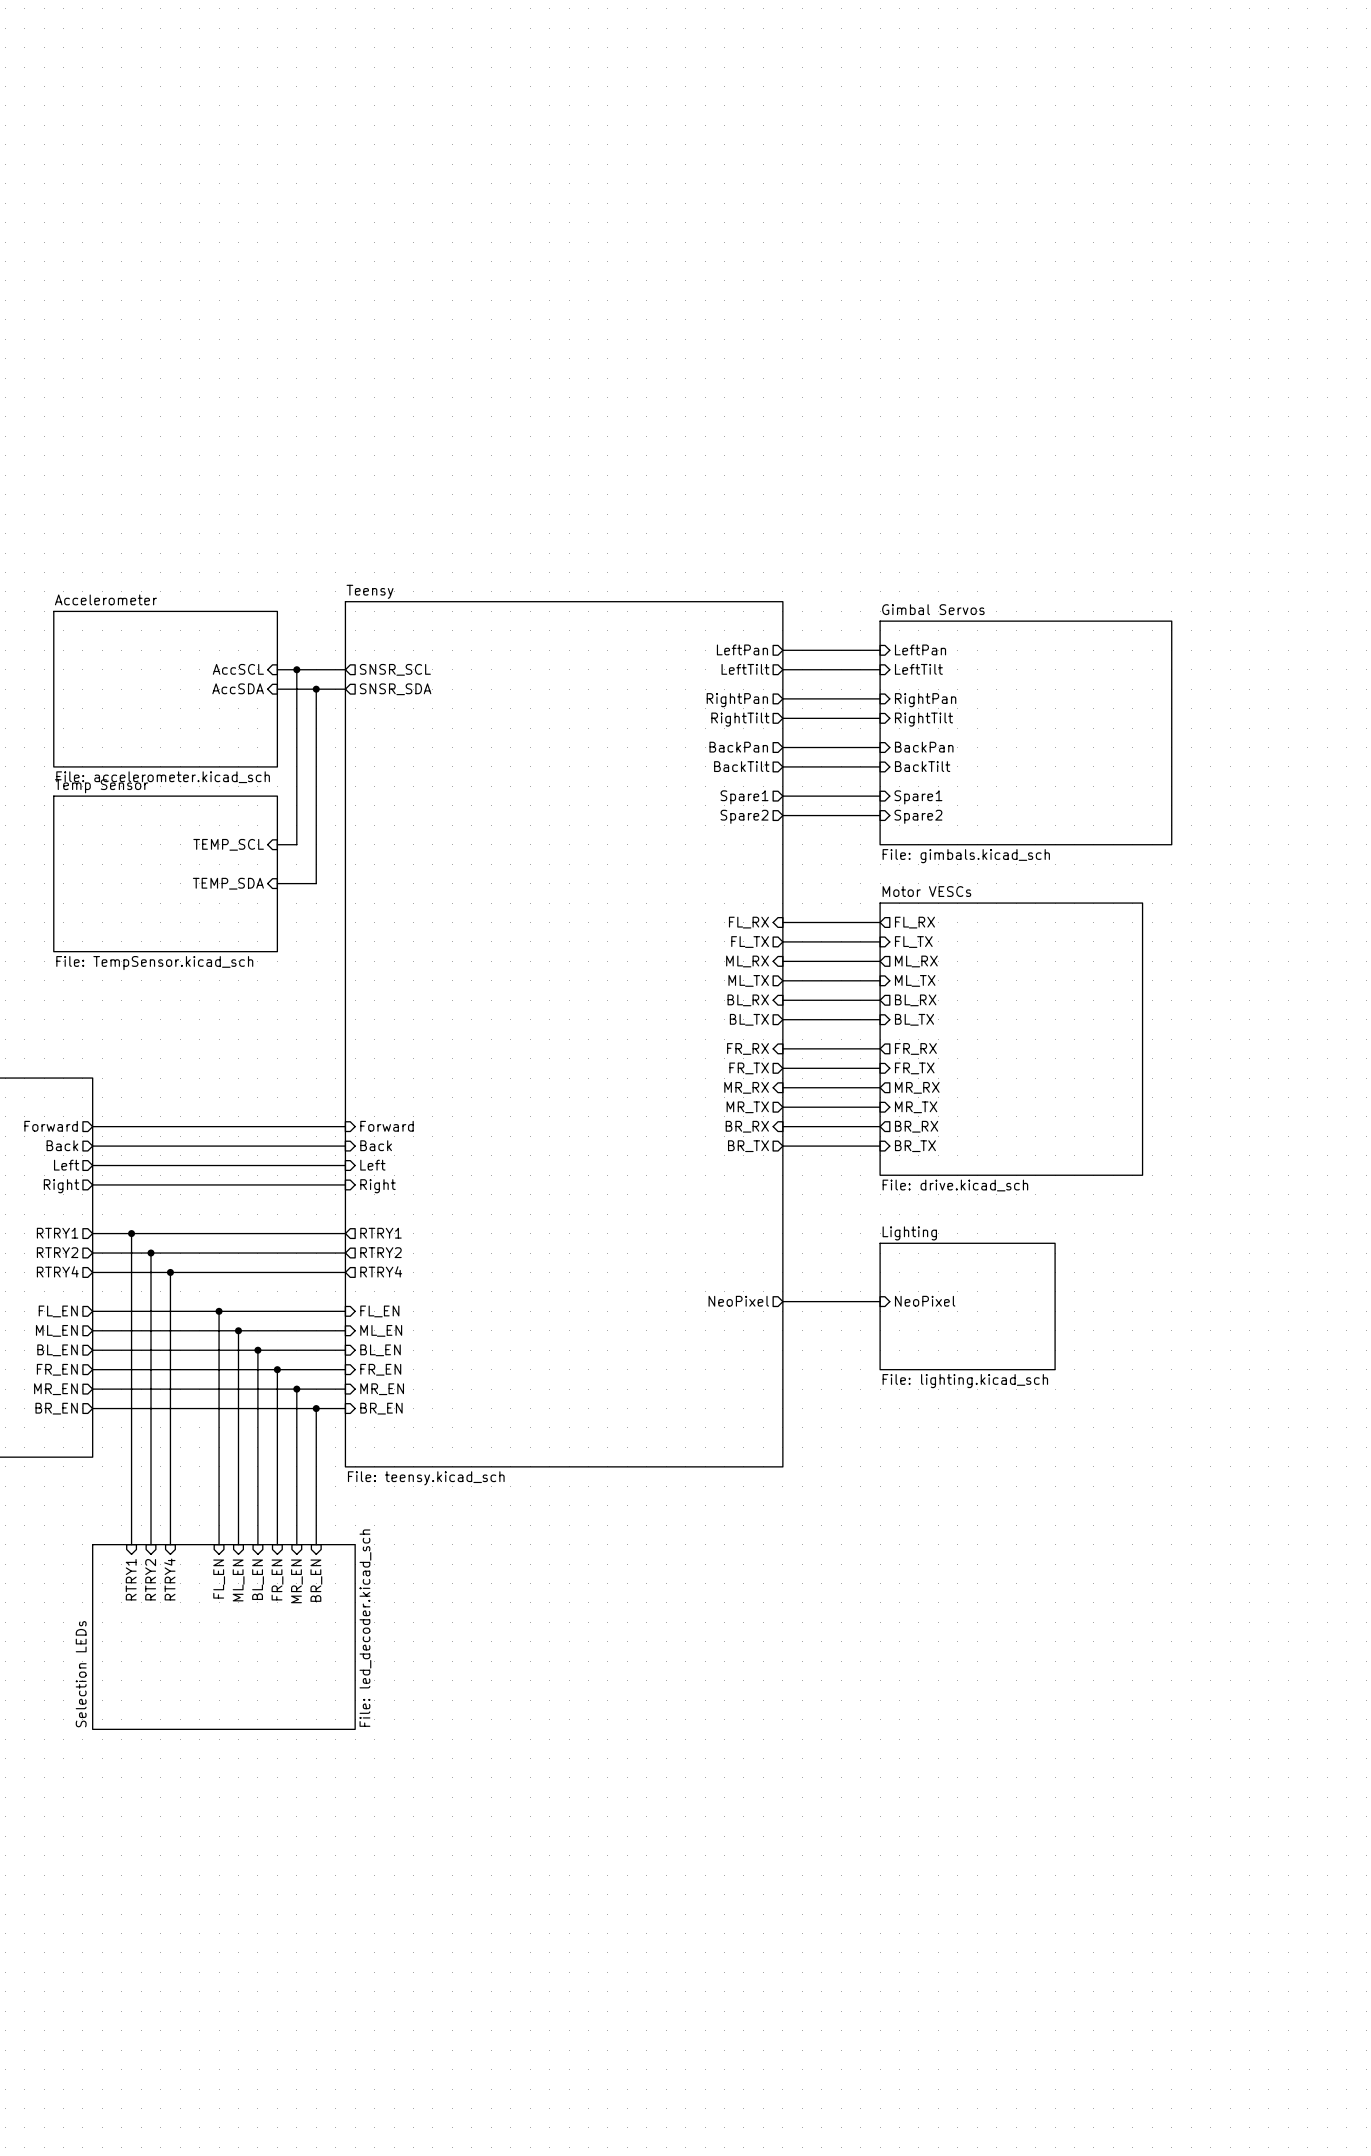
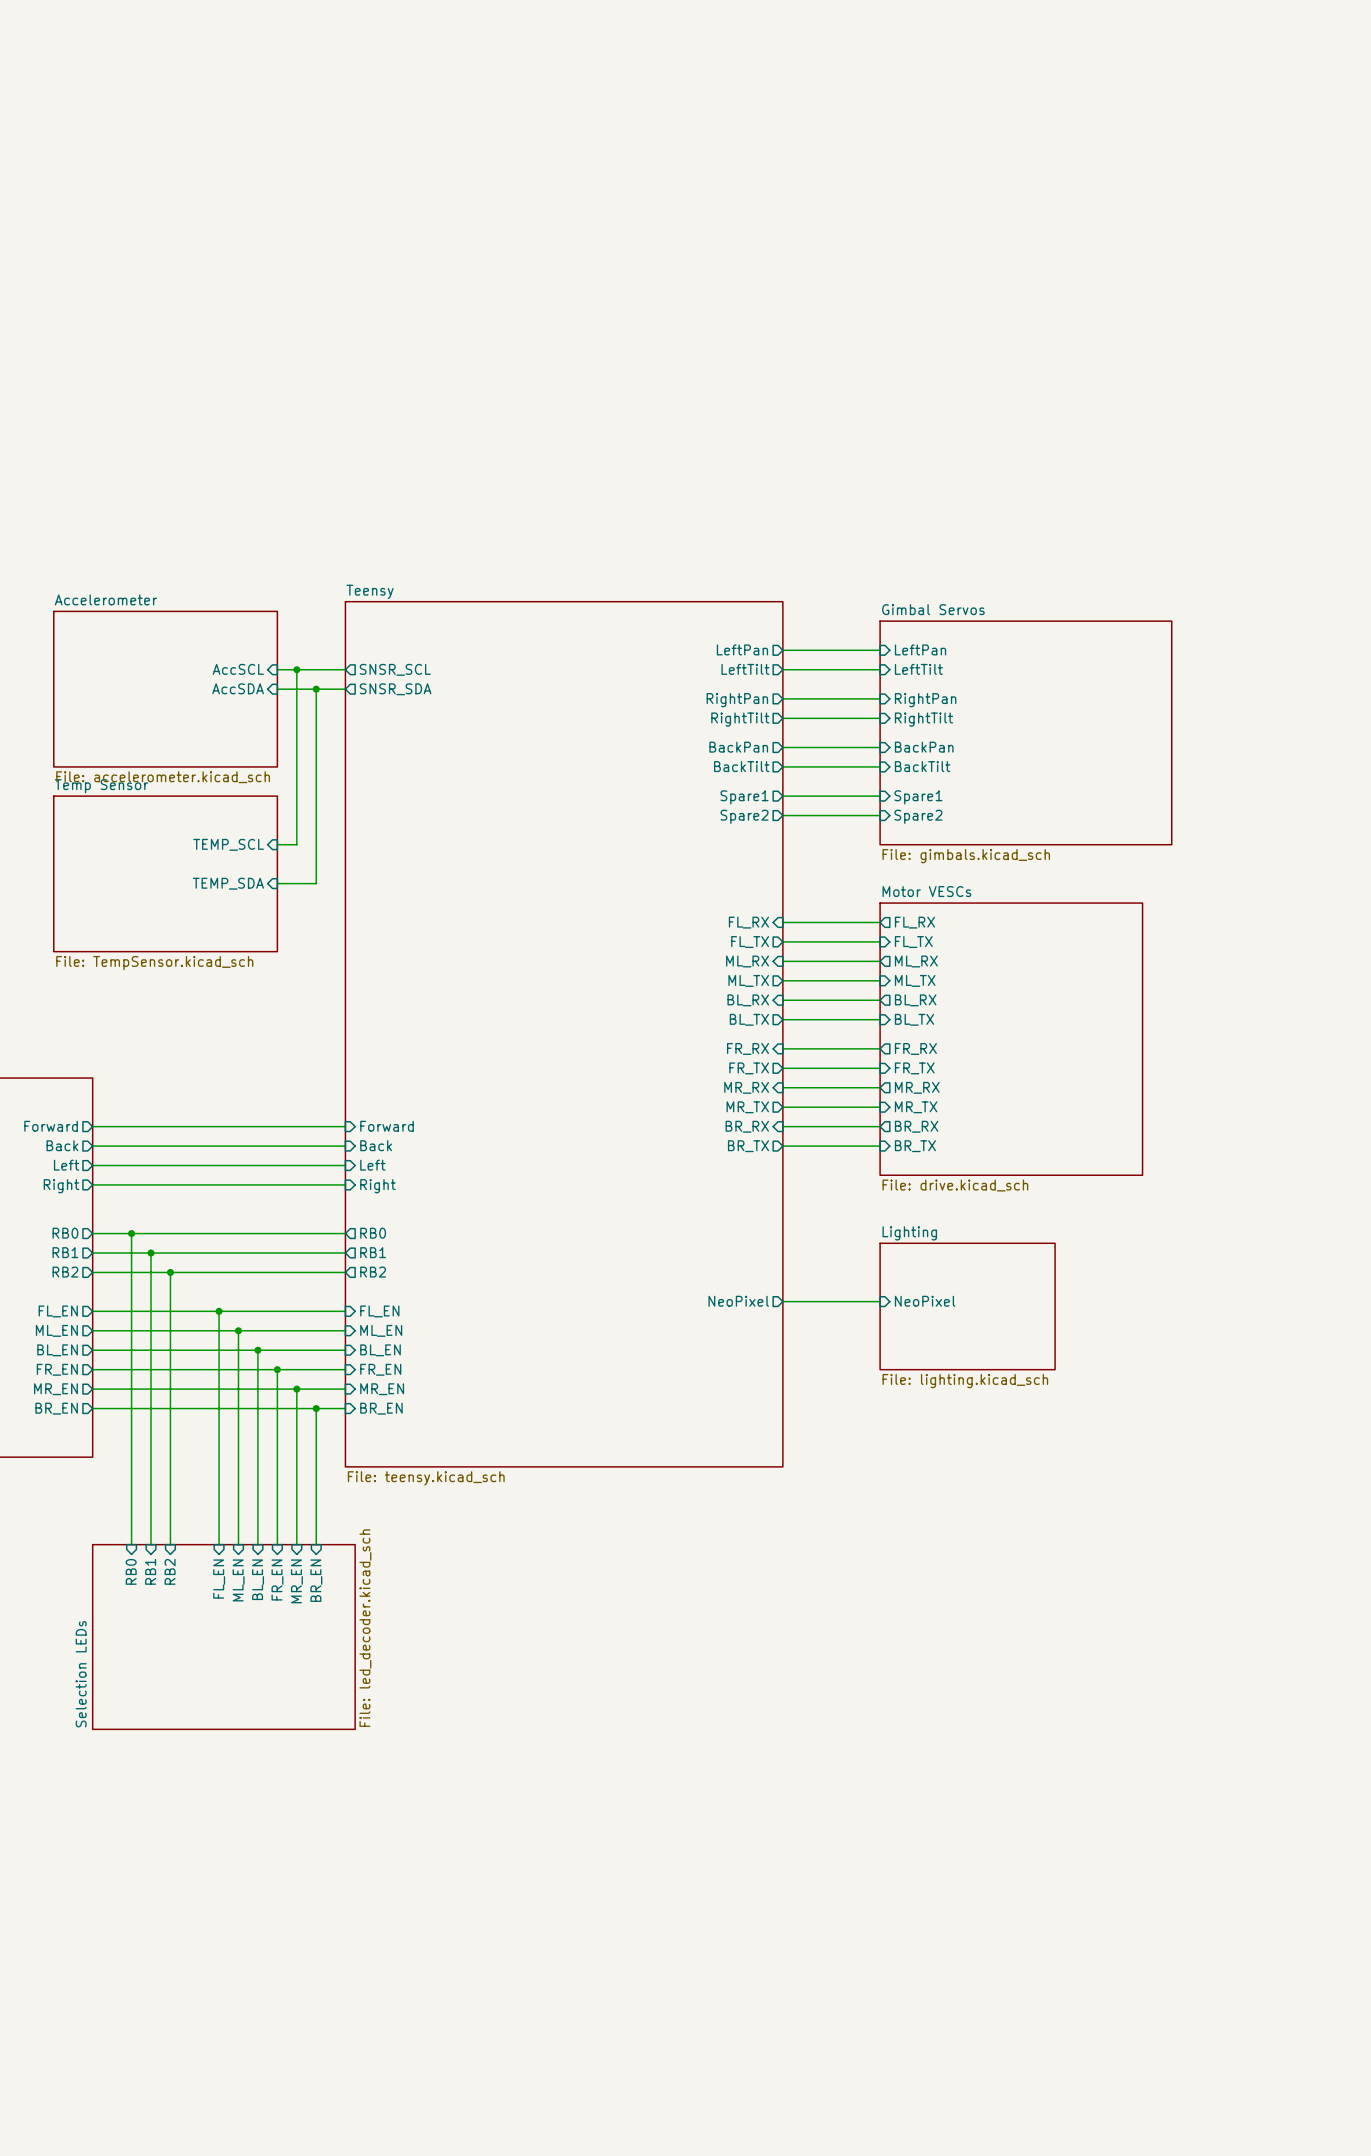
sheet pin: RTRY1 (57, 1233) -> RB0 (65, 1233)
sheet pin: RTRY1 (380, 1233) -> RB0 (373, 1233)
sheet pin: RTRY2 (57, 1252) -> RB1 (65, 1252)
sheet pin: RTRY2 (380, 1252) -> RB1 (373, 1252)
sheet pin: RTRY4 (57, 1271) -> RB2 (65, 1272)
sheet pin: RTRY4 (381, 1271) -> RB2 (373, 1272)
sheet pin: RTRY1 (131, 1579) -> RB0 (131, 1571)
sheet pin: RTRY2 (150, 1579) -> RB1 (150, 1571)
sheet pin: RTRY4 (169, 1579) -> RB2 (170, 1571)

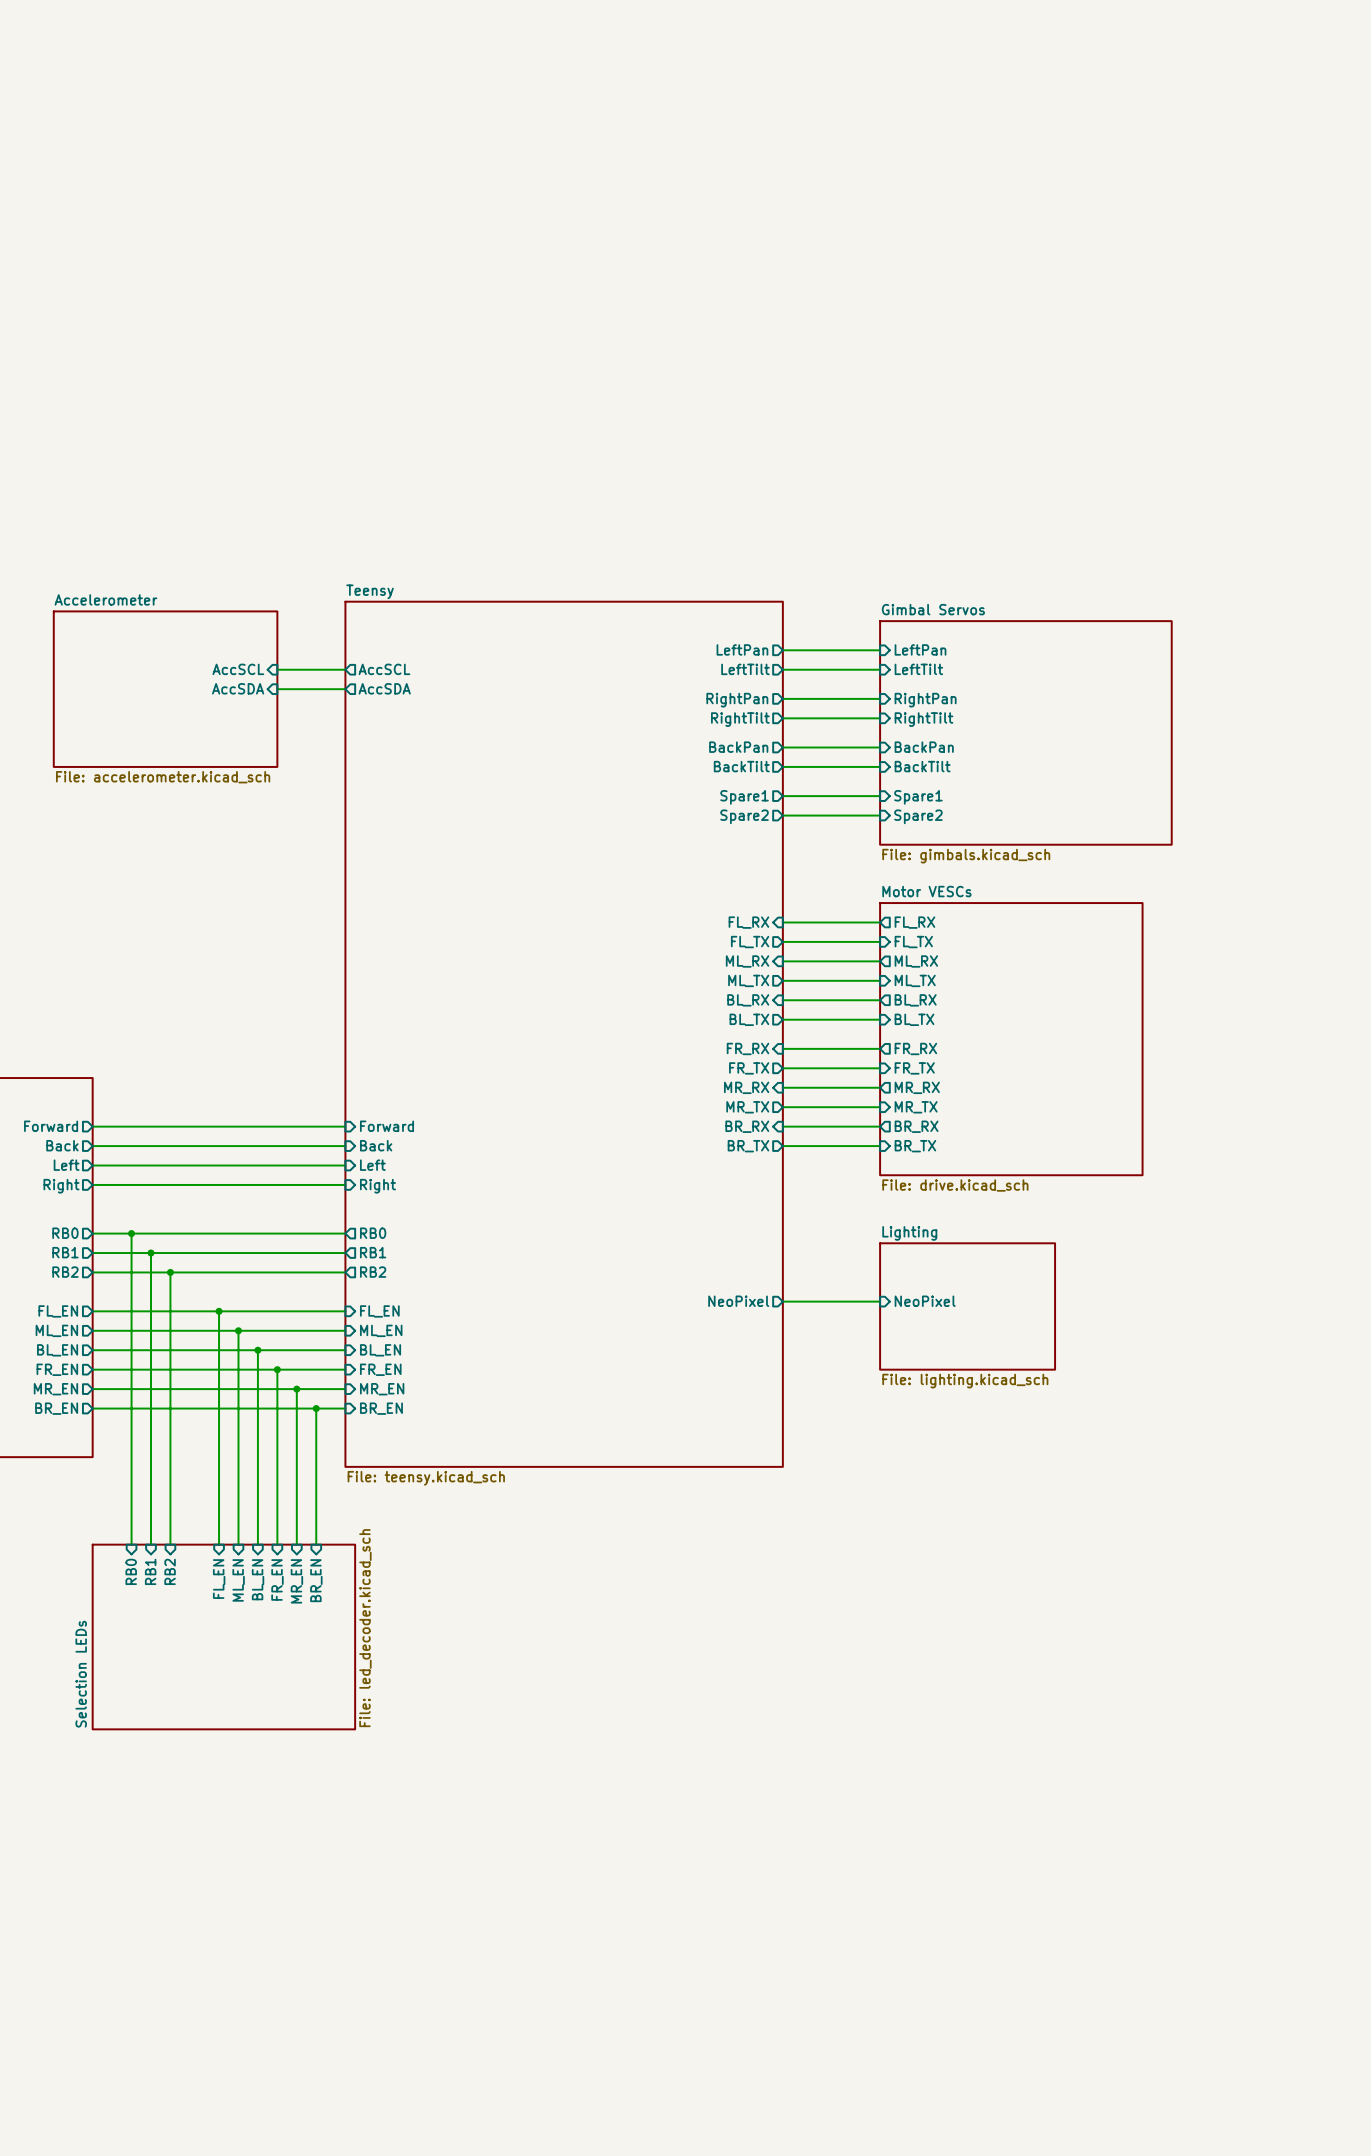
wire: (296, 669) (296, 844) (277, 844) -> none
junction: (296, 669) -> none
sheet pin: SNSR_SCL (395, 669) -> AccSCL (384, 669)
wire: (316, 689) (316, 883) (277, 883) -> none
junction: (316, 689) -> none
sheet pin: SNSR_SDA (395, 689) -> AccSDA (384, 688)
sheet pin: TEMP_SCL (228, 844) -> none
sheet Temp Sensor: File: TempSensor.kicad_sch (165, 873) -> none
sheet pin: TEMP_SDA (228, 883) -> none

